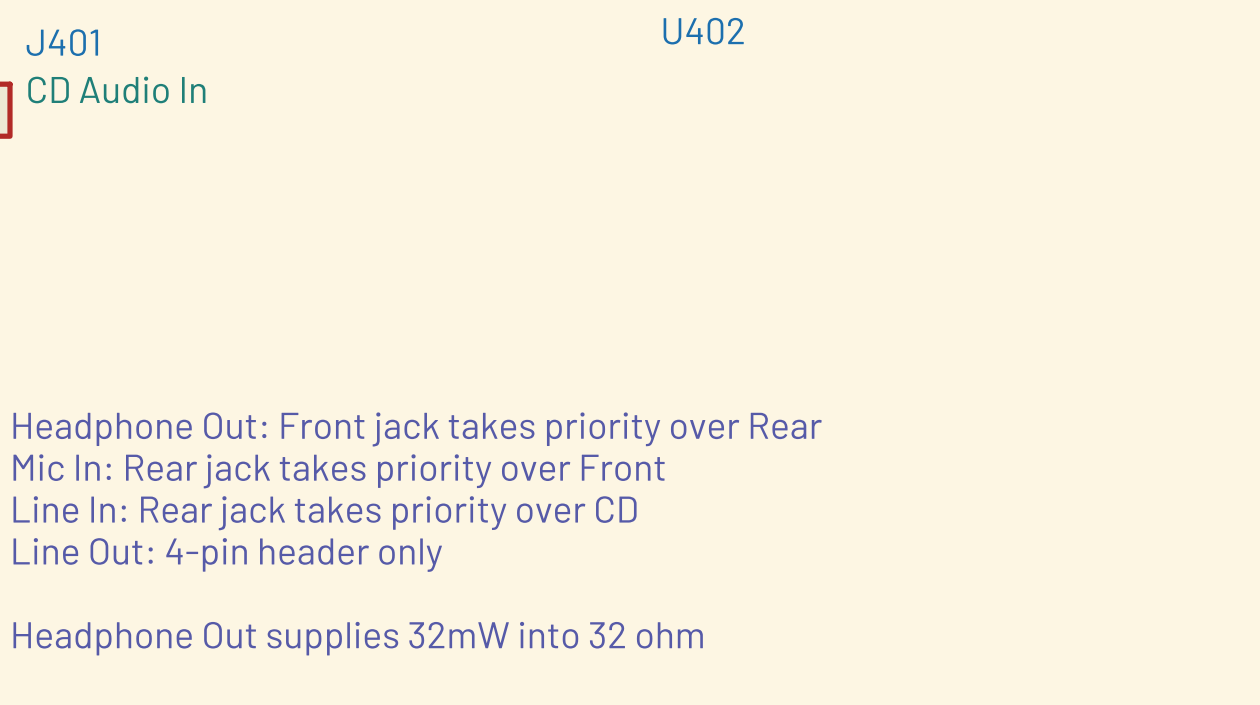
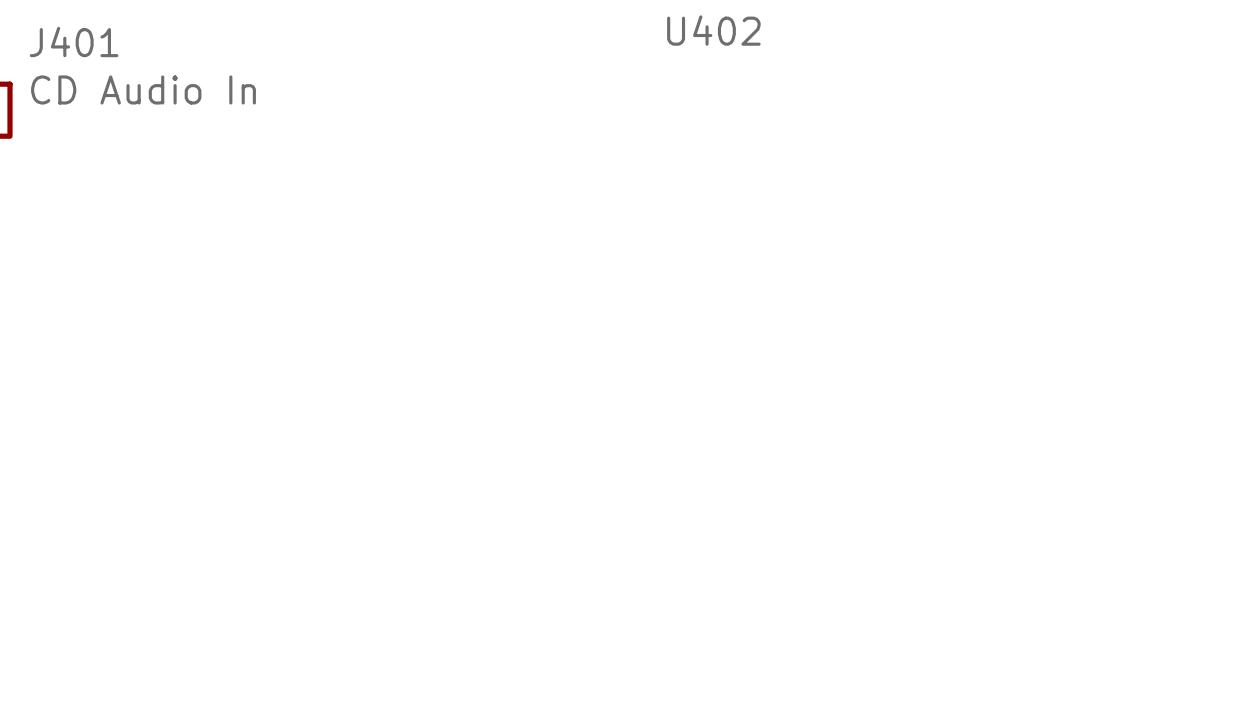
text: Headphone Out: Front jack takes priority over Rear (417, 429) -> none
text: Mic In: Rear jack takes priority over Front (339, 471) -> none
text: Line In: Rear jack takes priority over CD (325, 513) -> none
text: Line Out: 4-pin header only (227, 554) -> none
text: Headphone Out supplies 32mW into 32 ohm (358, 638) -> none

